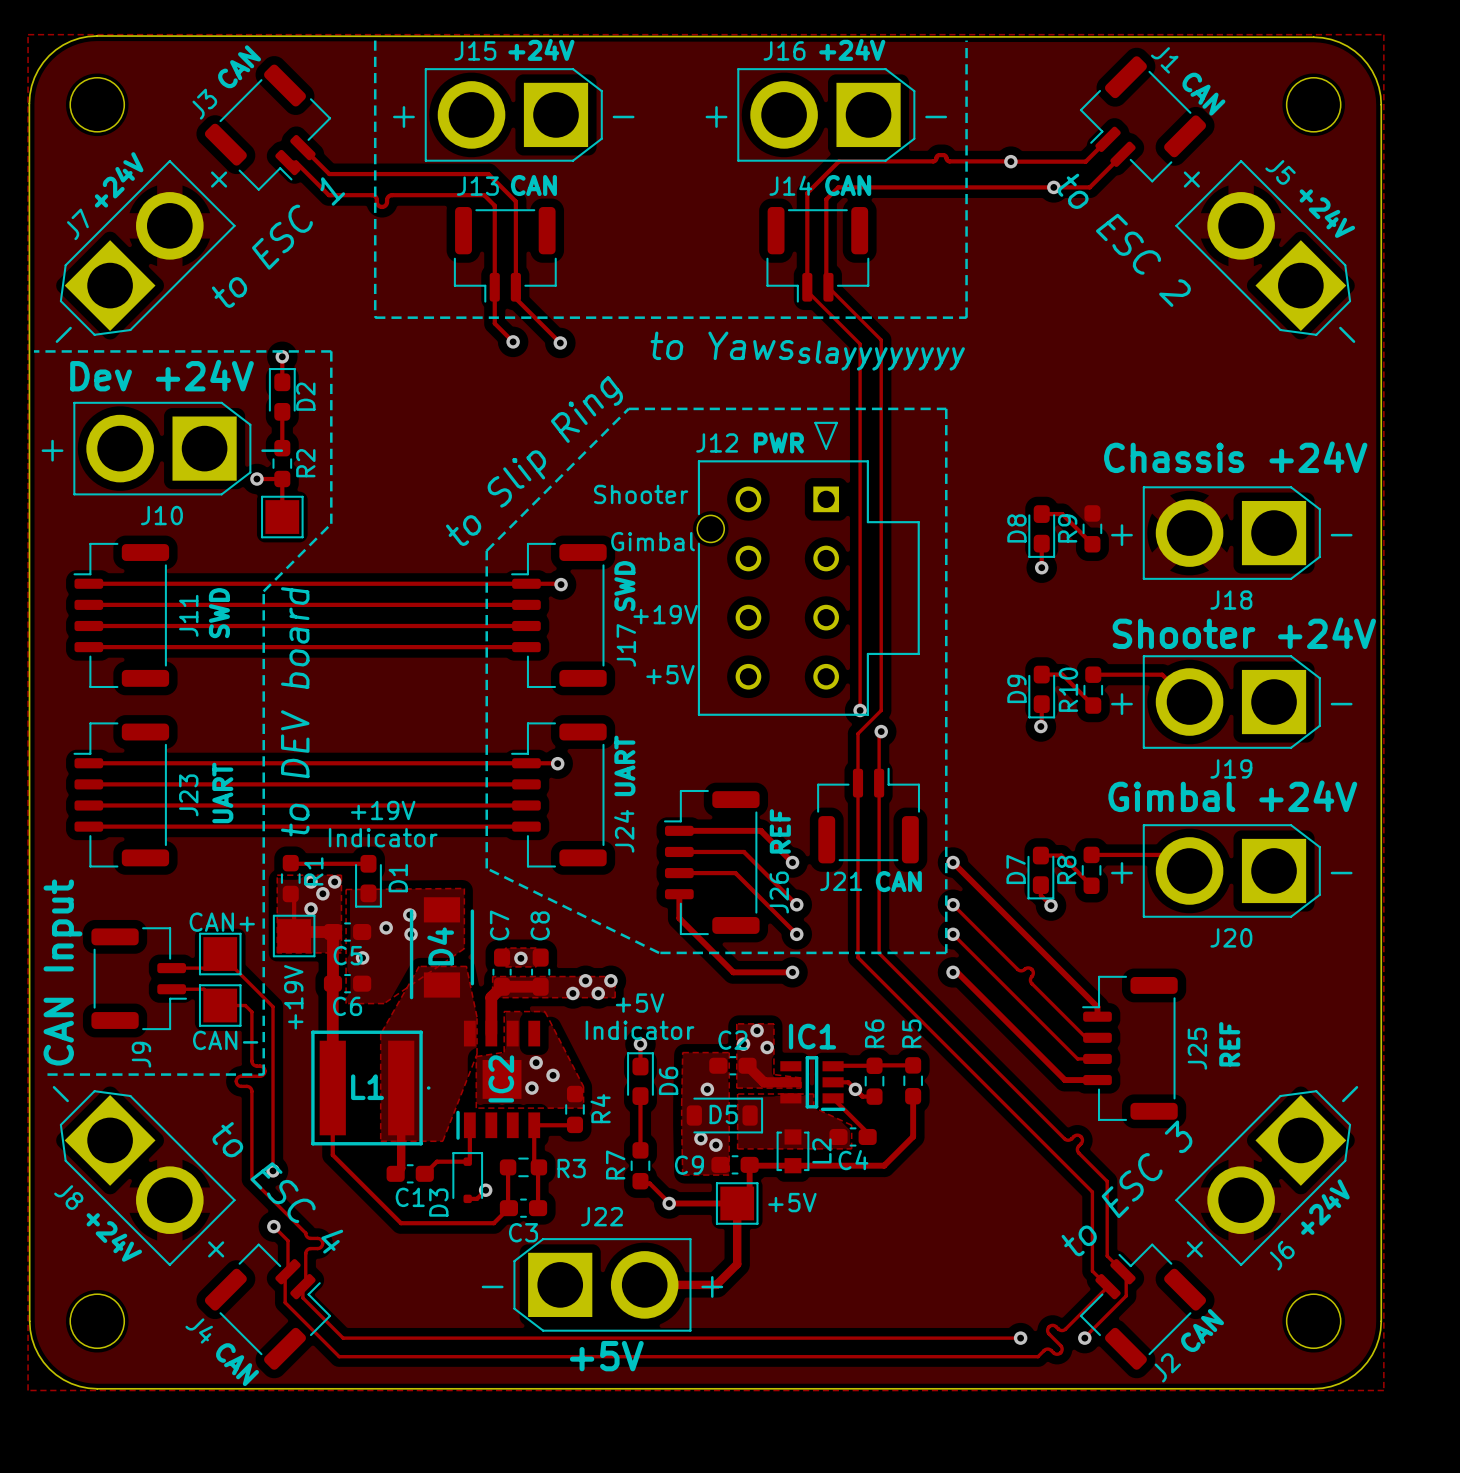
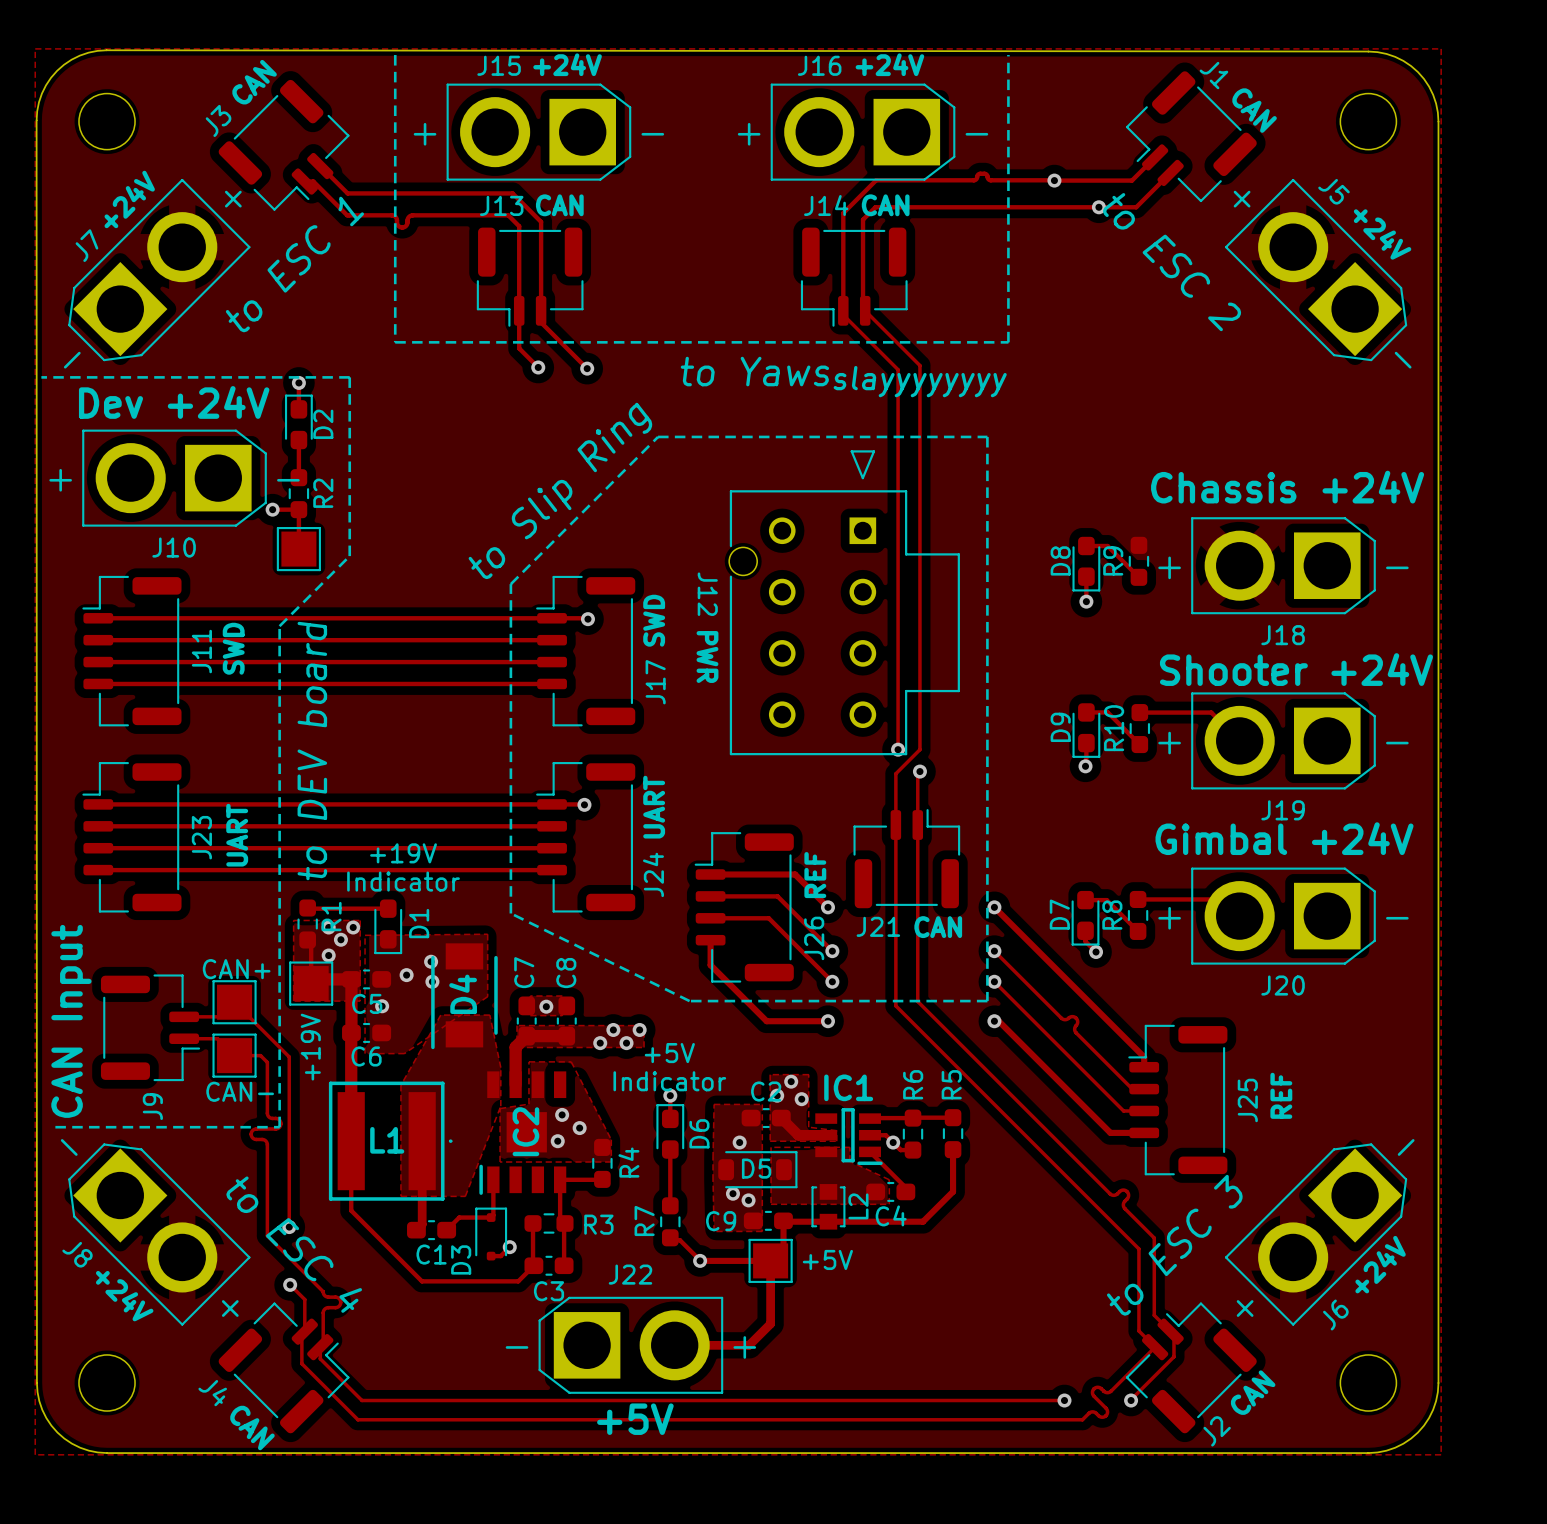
text: J12 (717, 442) -> none
text rotation: 0° (778, 442) -> 90° clockwise (707, 656)
text position: PWR (778, 442) -> PWR (707, 656)
text: Shooter (641, 494) -> none
text: Gimbal (653, 541) -> none
J12 name: none -> J12 (707, 594)
text: +19V (665, 614) -> none
text: +5V (670, 674) -> none

